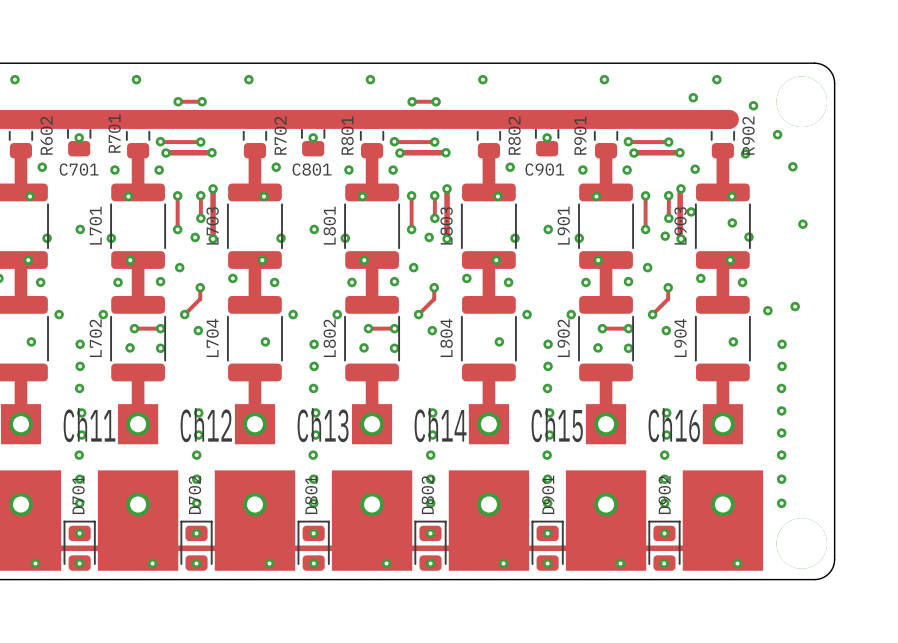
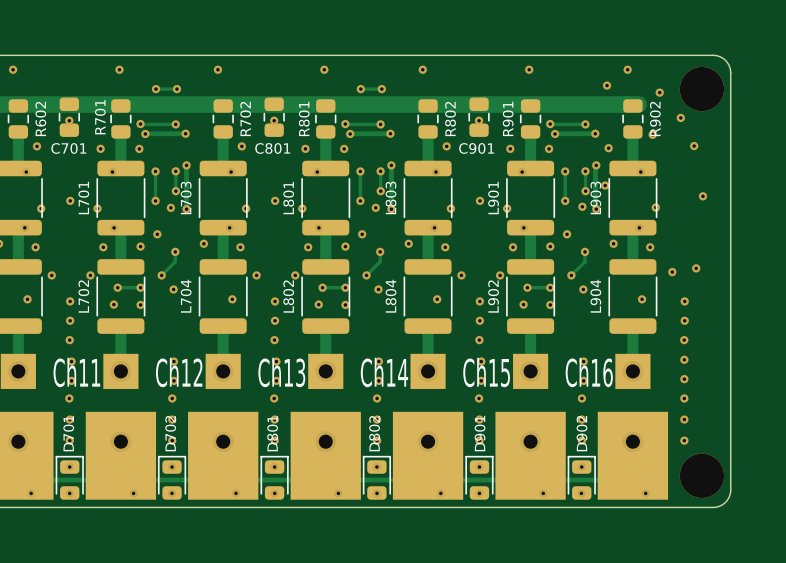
via: (732, 222) -> none

